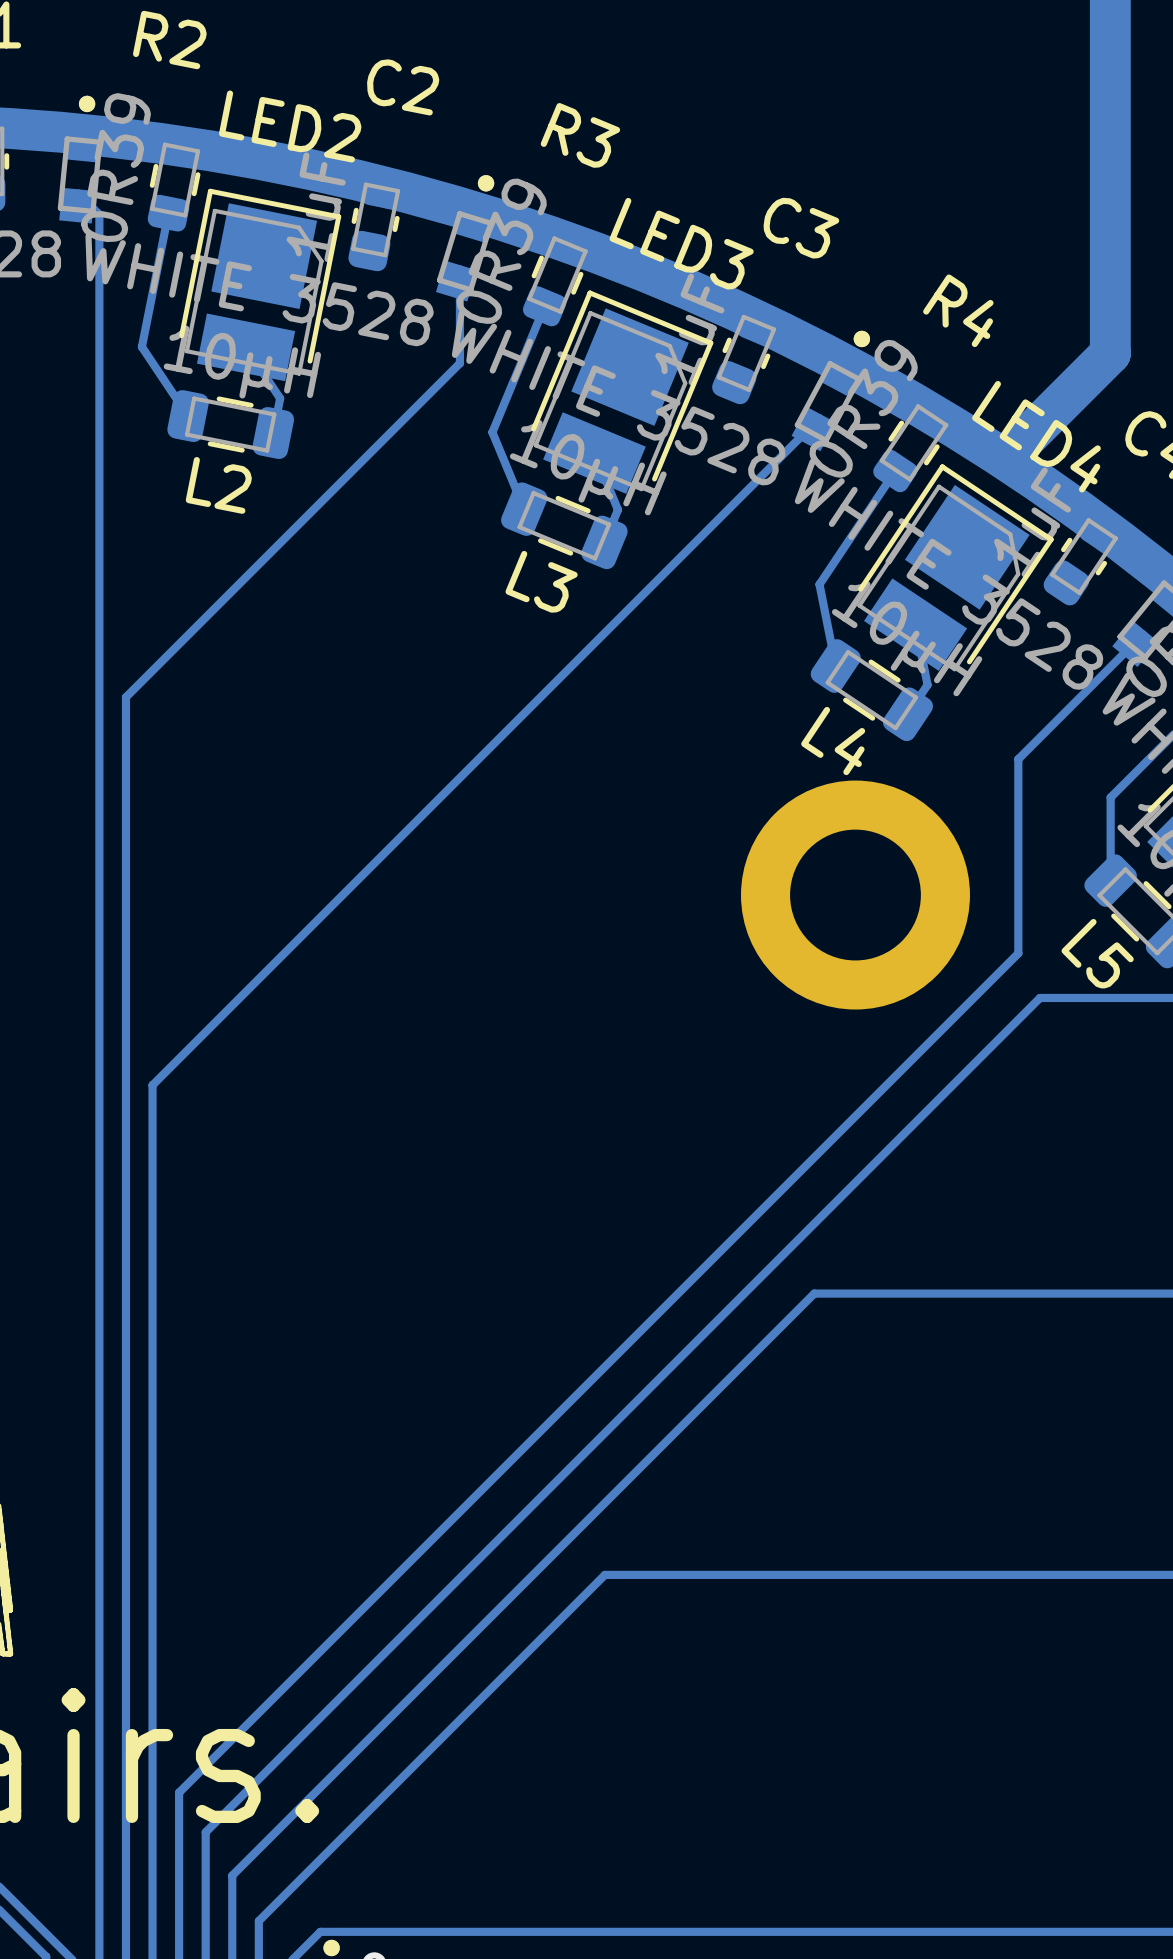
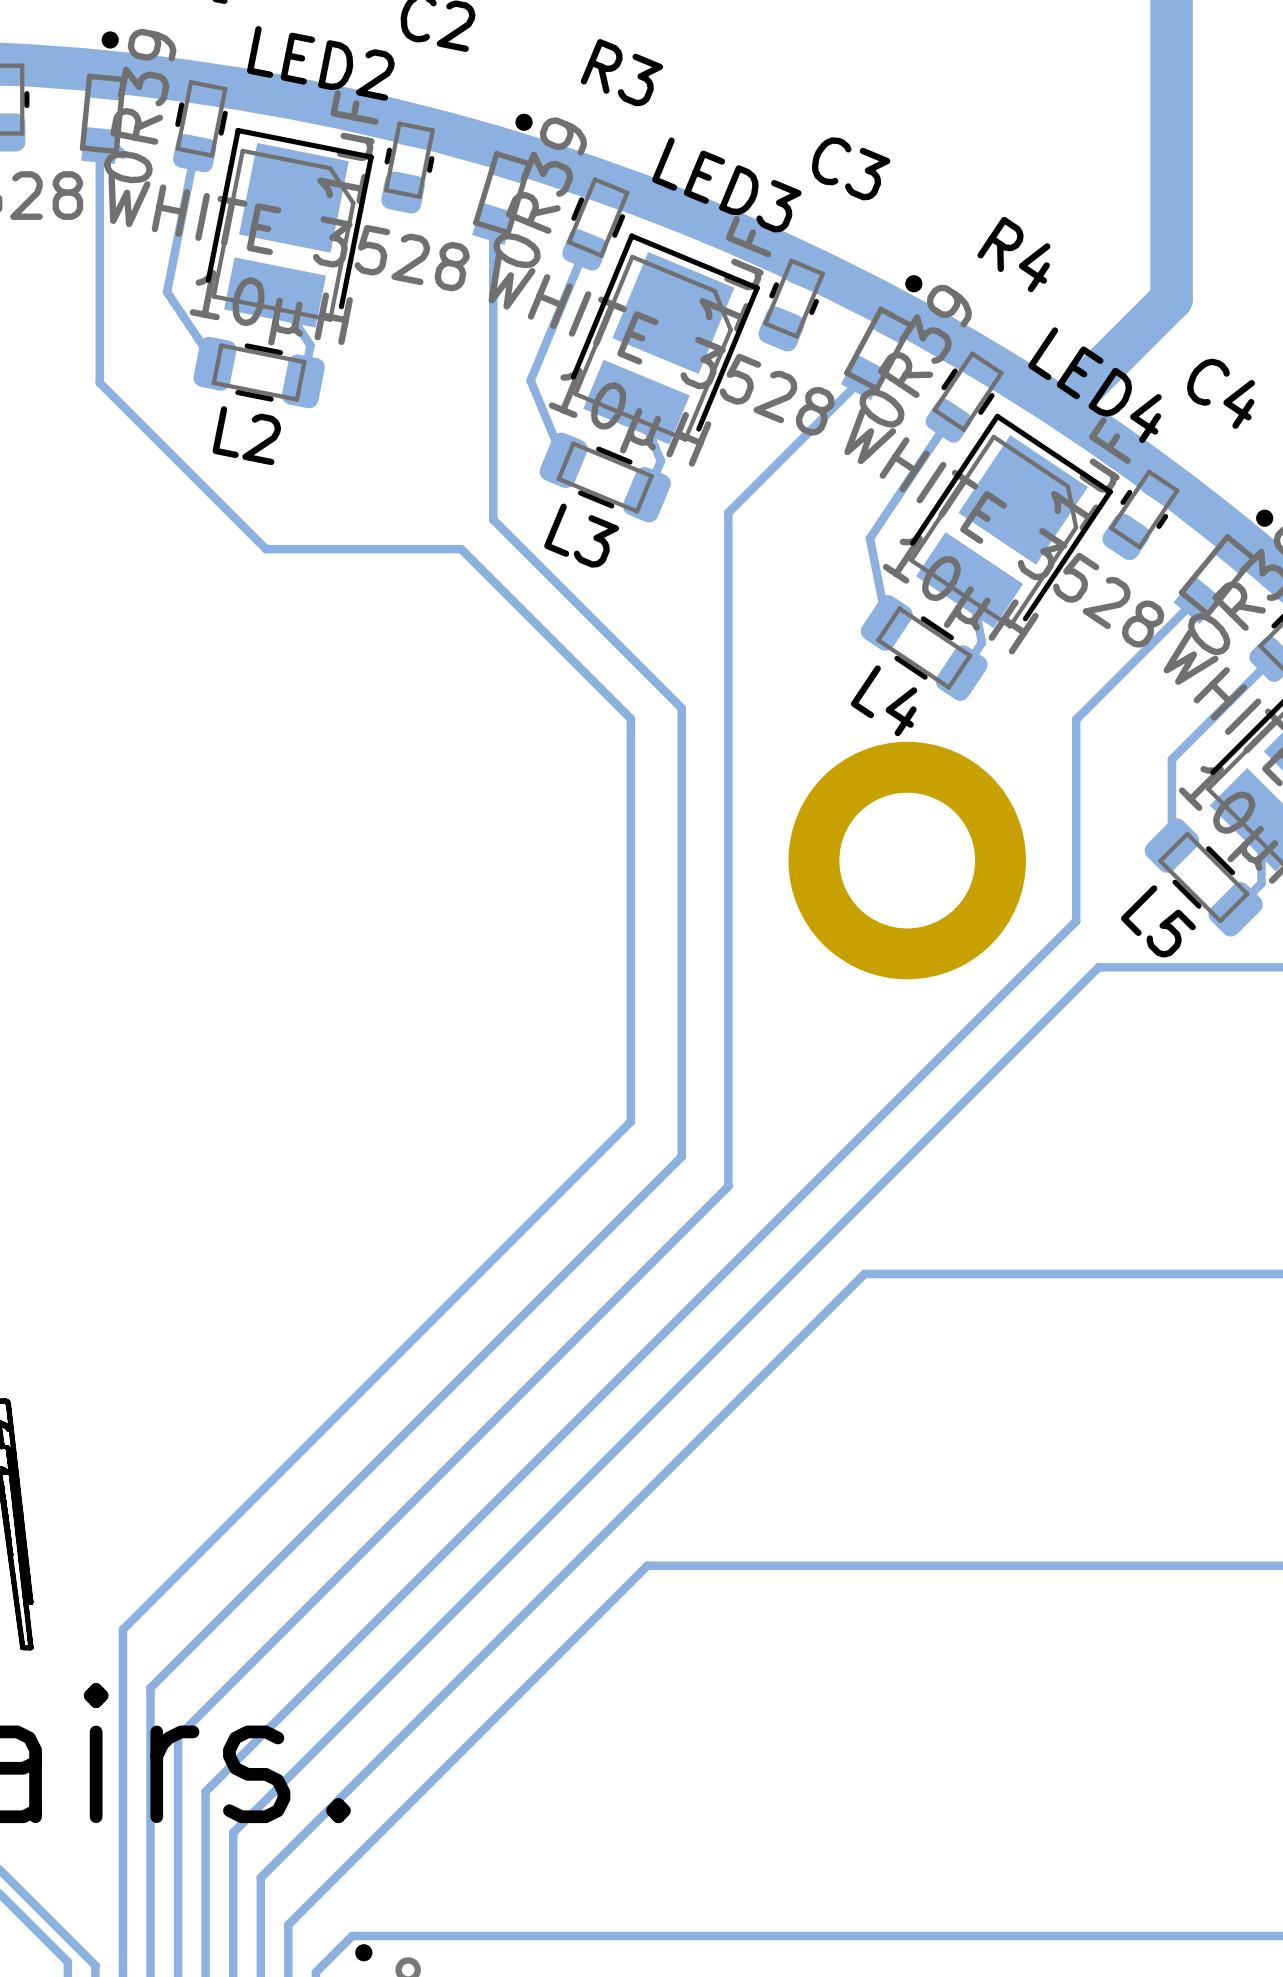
track: (99, 214) (99, 1636) -> (99, 145) (99, 382) (266, 549) (461, 549) (630, 718) (630, 1121) (122, 1629)
track: (459, 269) (459, 363) (125, 697) (125, 1692) -> (493, 223) (493, 519) (681, 708) (681, 1156) (150, 1687)
track: (819, 418) (152, 1085) (152, 1739) -> (863, 377) (728, 512) (728, 1186) (178, 1736)

